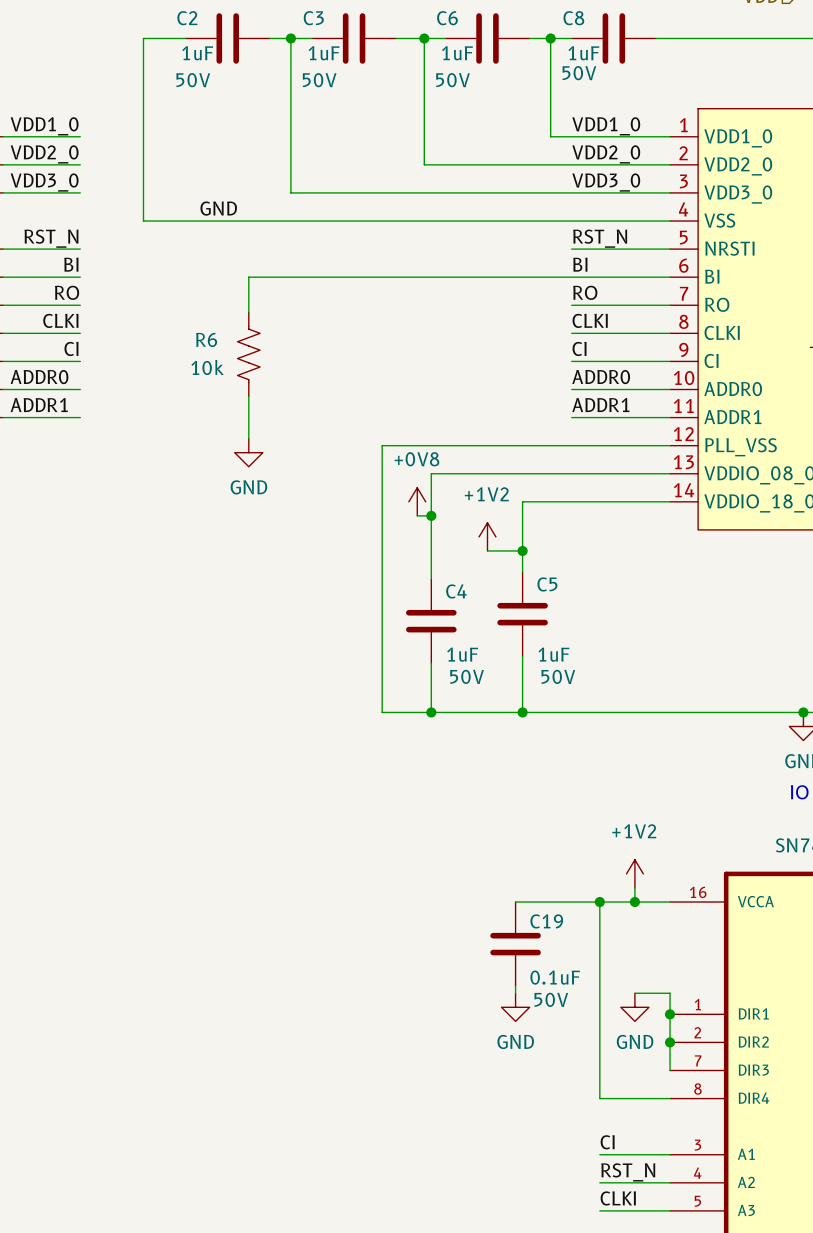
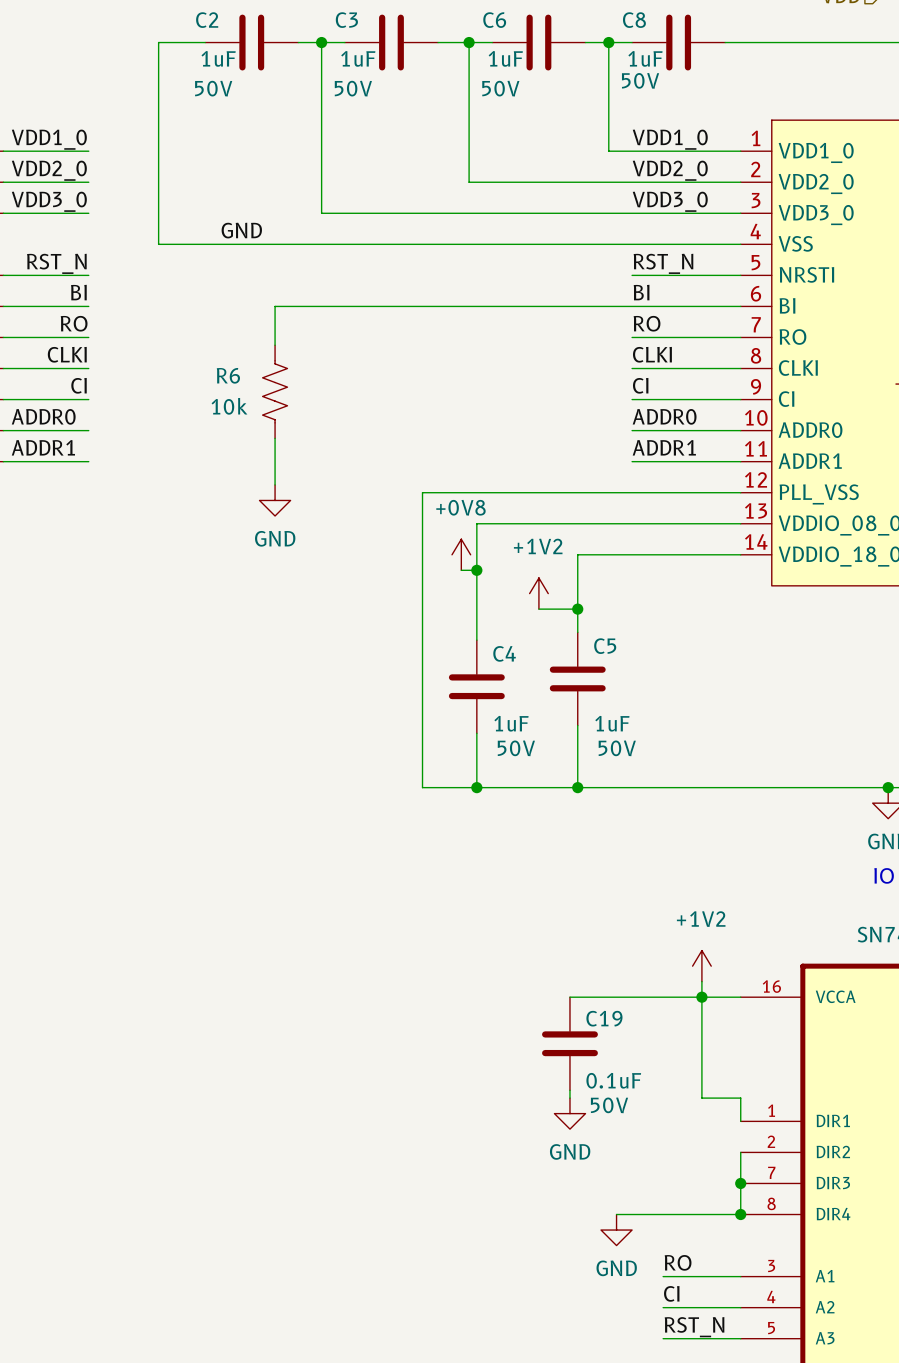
wire: (599, 902) (599, 1098) -> (616, 1214) (663, 1214)
junction: (599, 902) -> none
wire: none -> (701, 997) (701, 1098)
power symbol position: GND (634, 1007) -> GND (616, 1230)
wire: (670, 1014) (670, 1042) -> (740, 1183) (740, 1214)
junction: (670, 1014) -> none
junction: (670, 1042) -> none
junction: none -> (740, 1183)
junction: none -> (740, 1214)
label: CI (607, 1142) -> RO (678, 1262)
label: RST_N (628, 1172) -> CI (671, 1293)
label: CLKI (618, 1198) -> RST_N (694, 1327)

